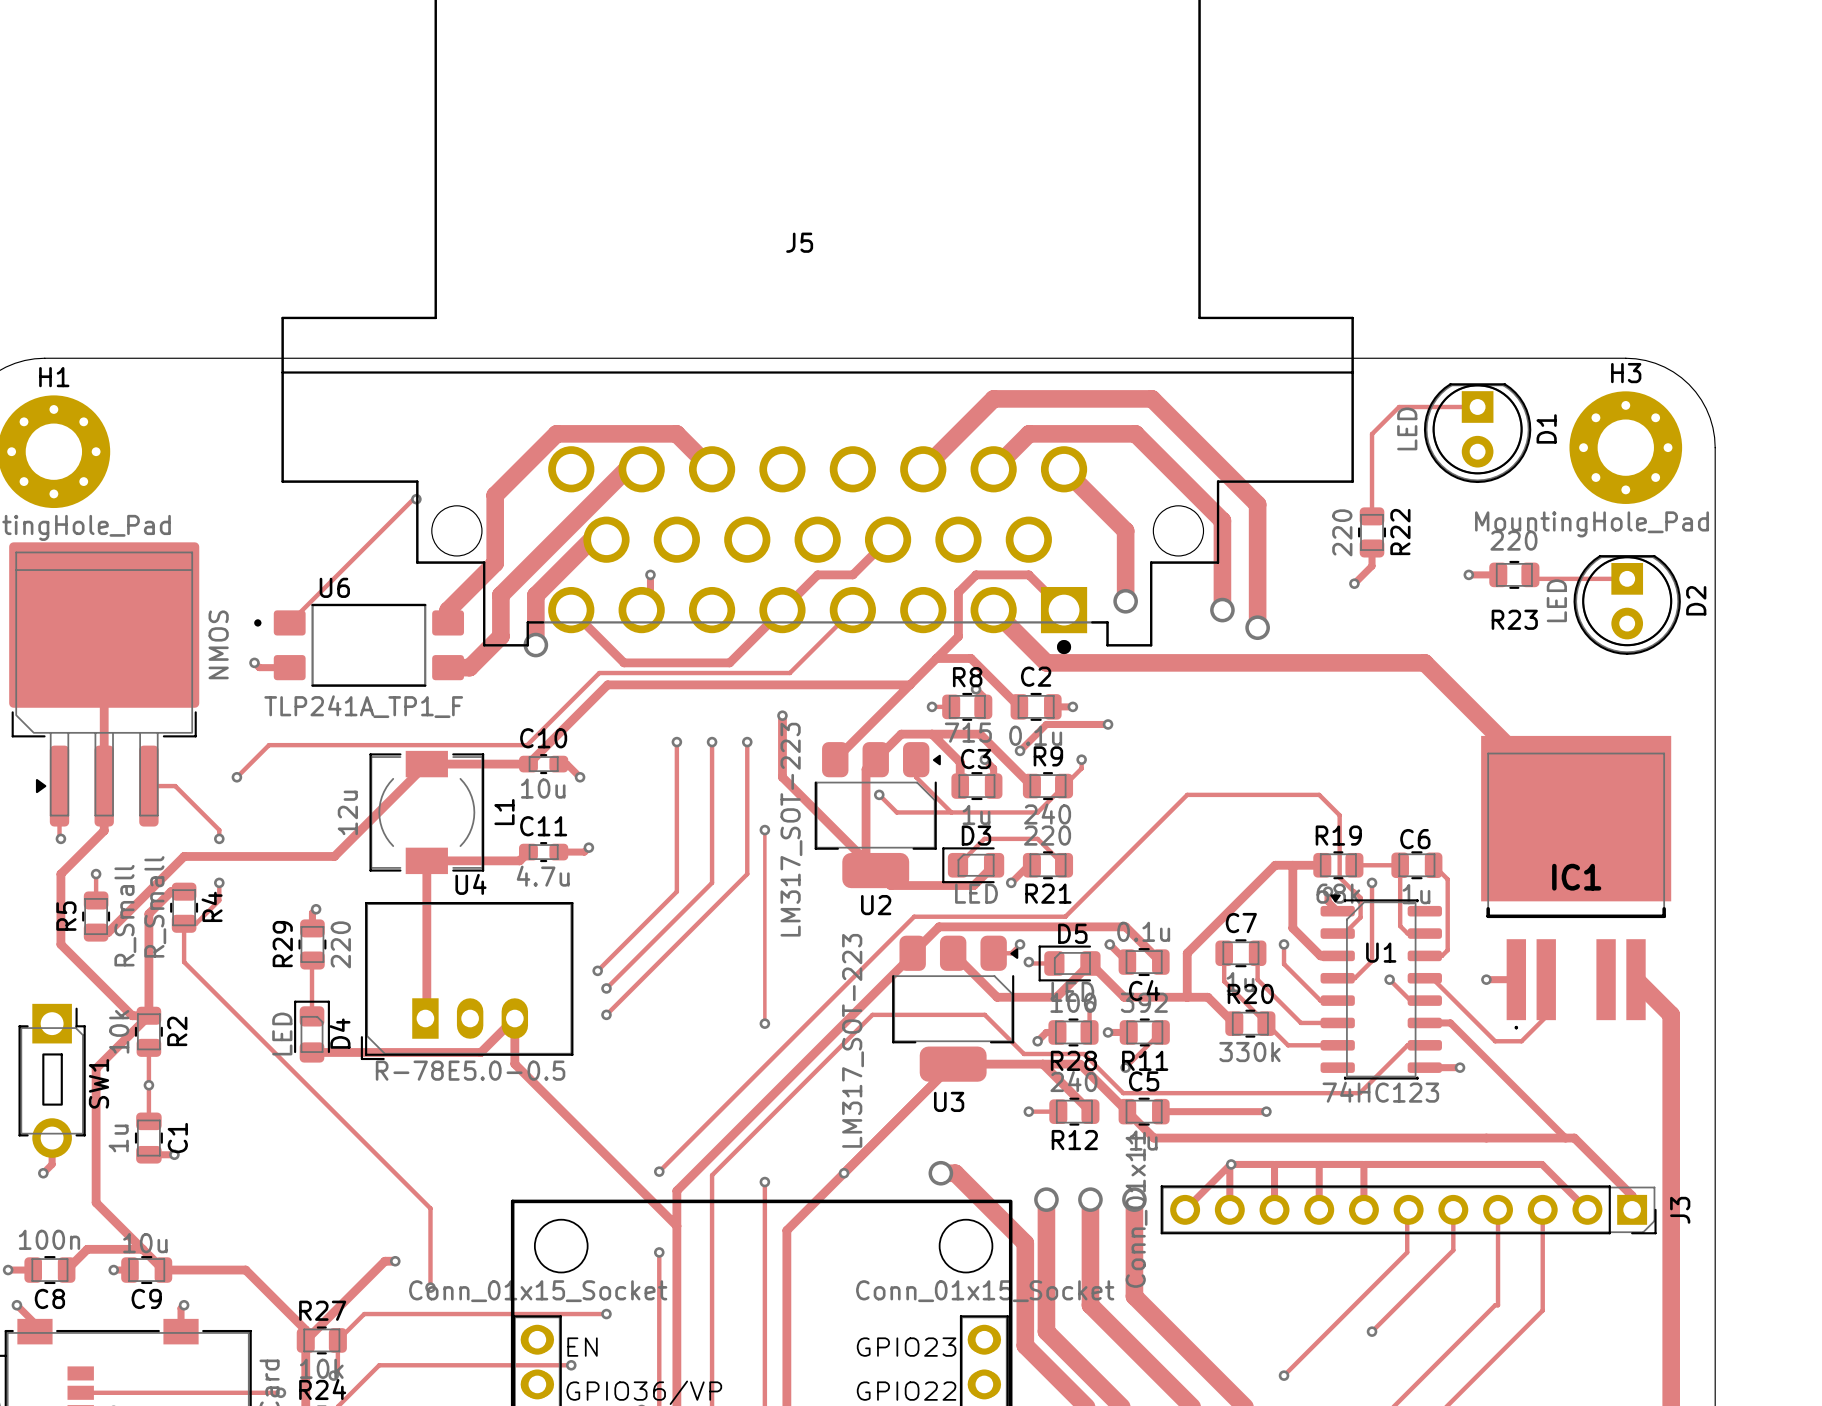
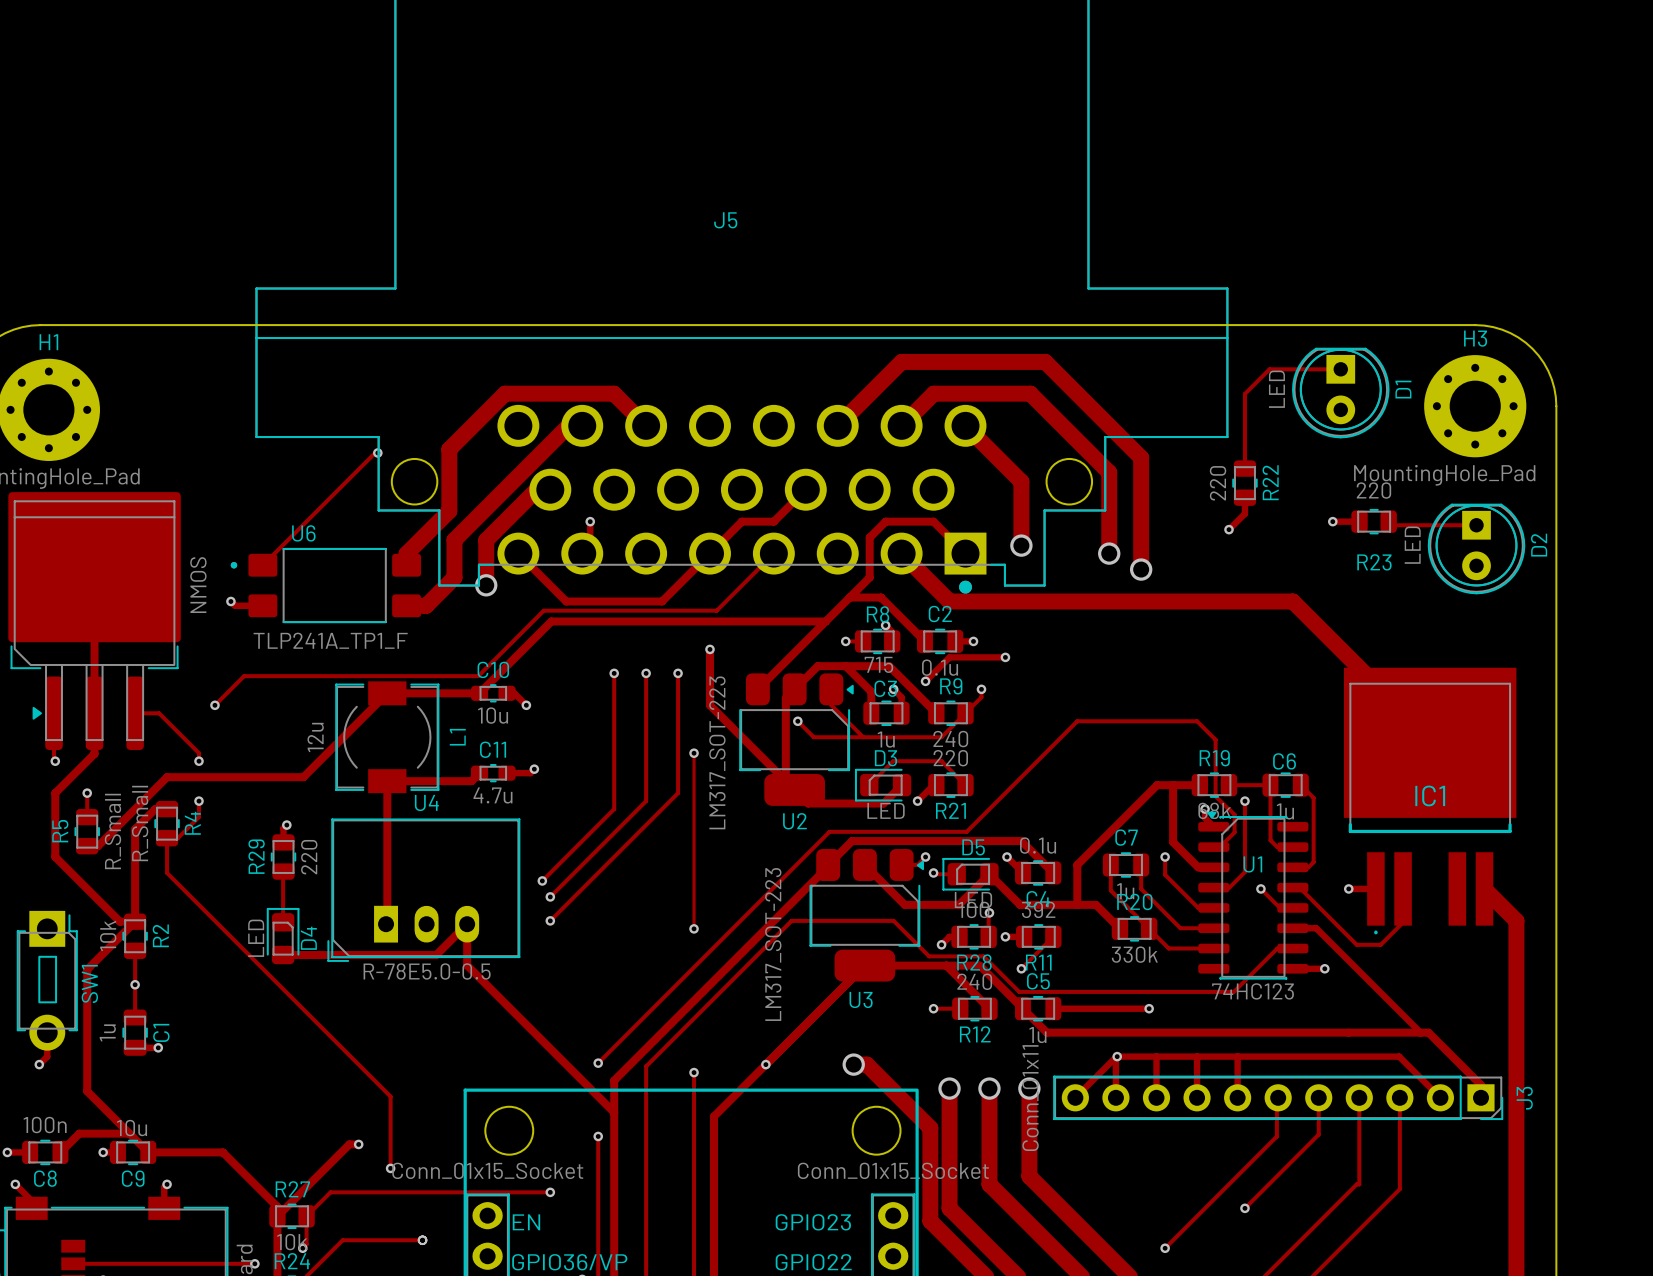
track: (571, 1365) (379, 1365) (377, 1366) -> (422, 1240) (342, 1240)
via: (571, 1365) -> none
via: none -> (422, 1240)

